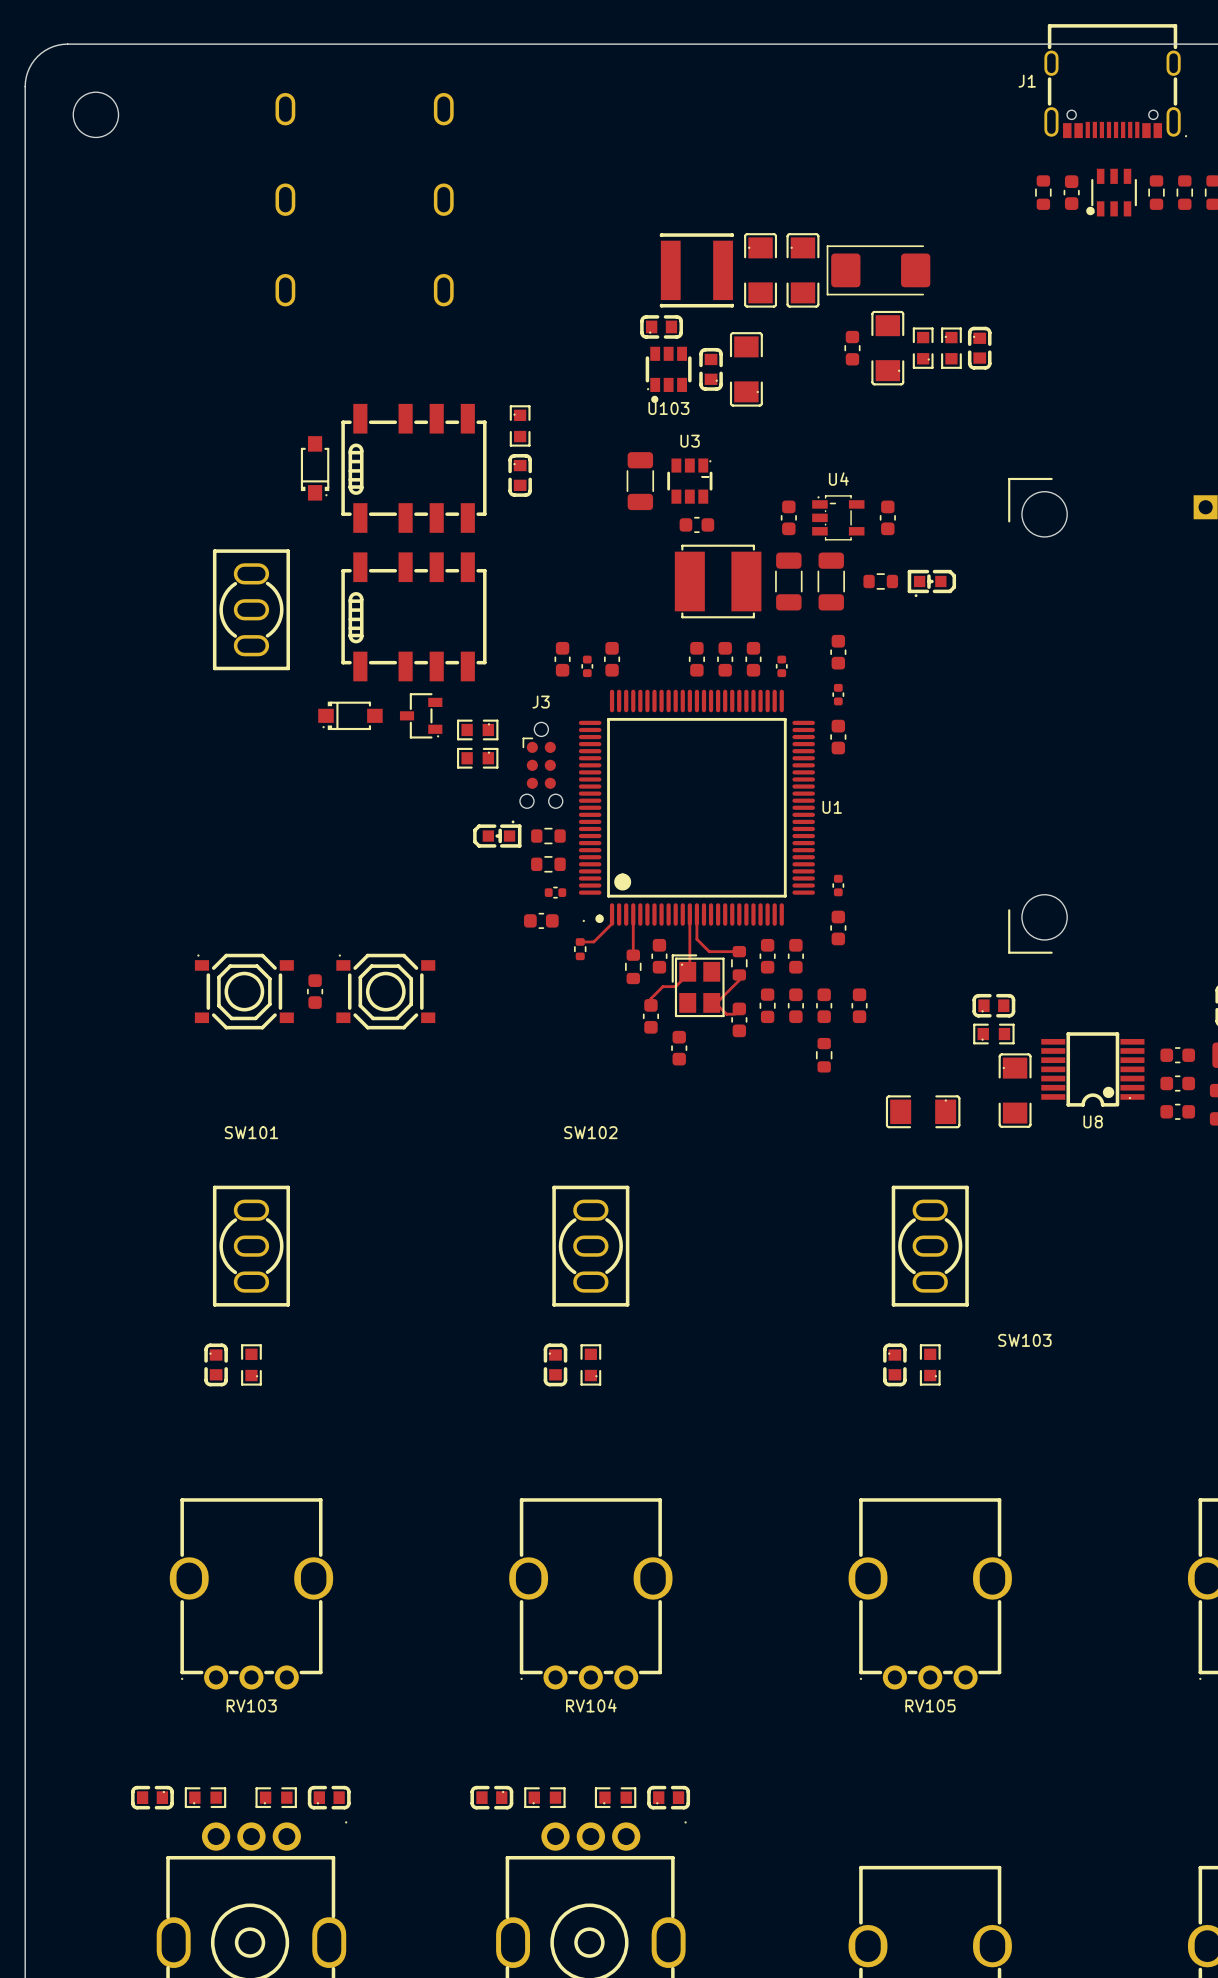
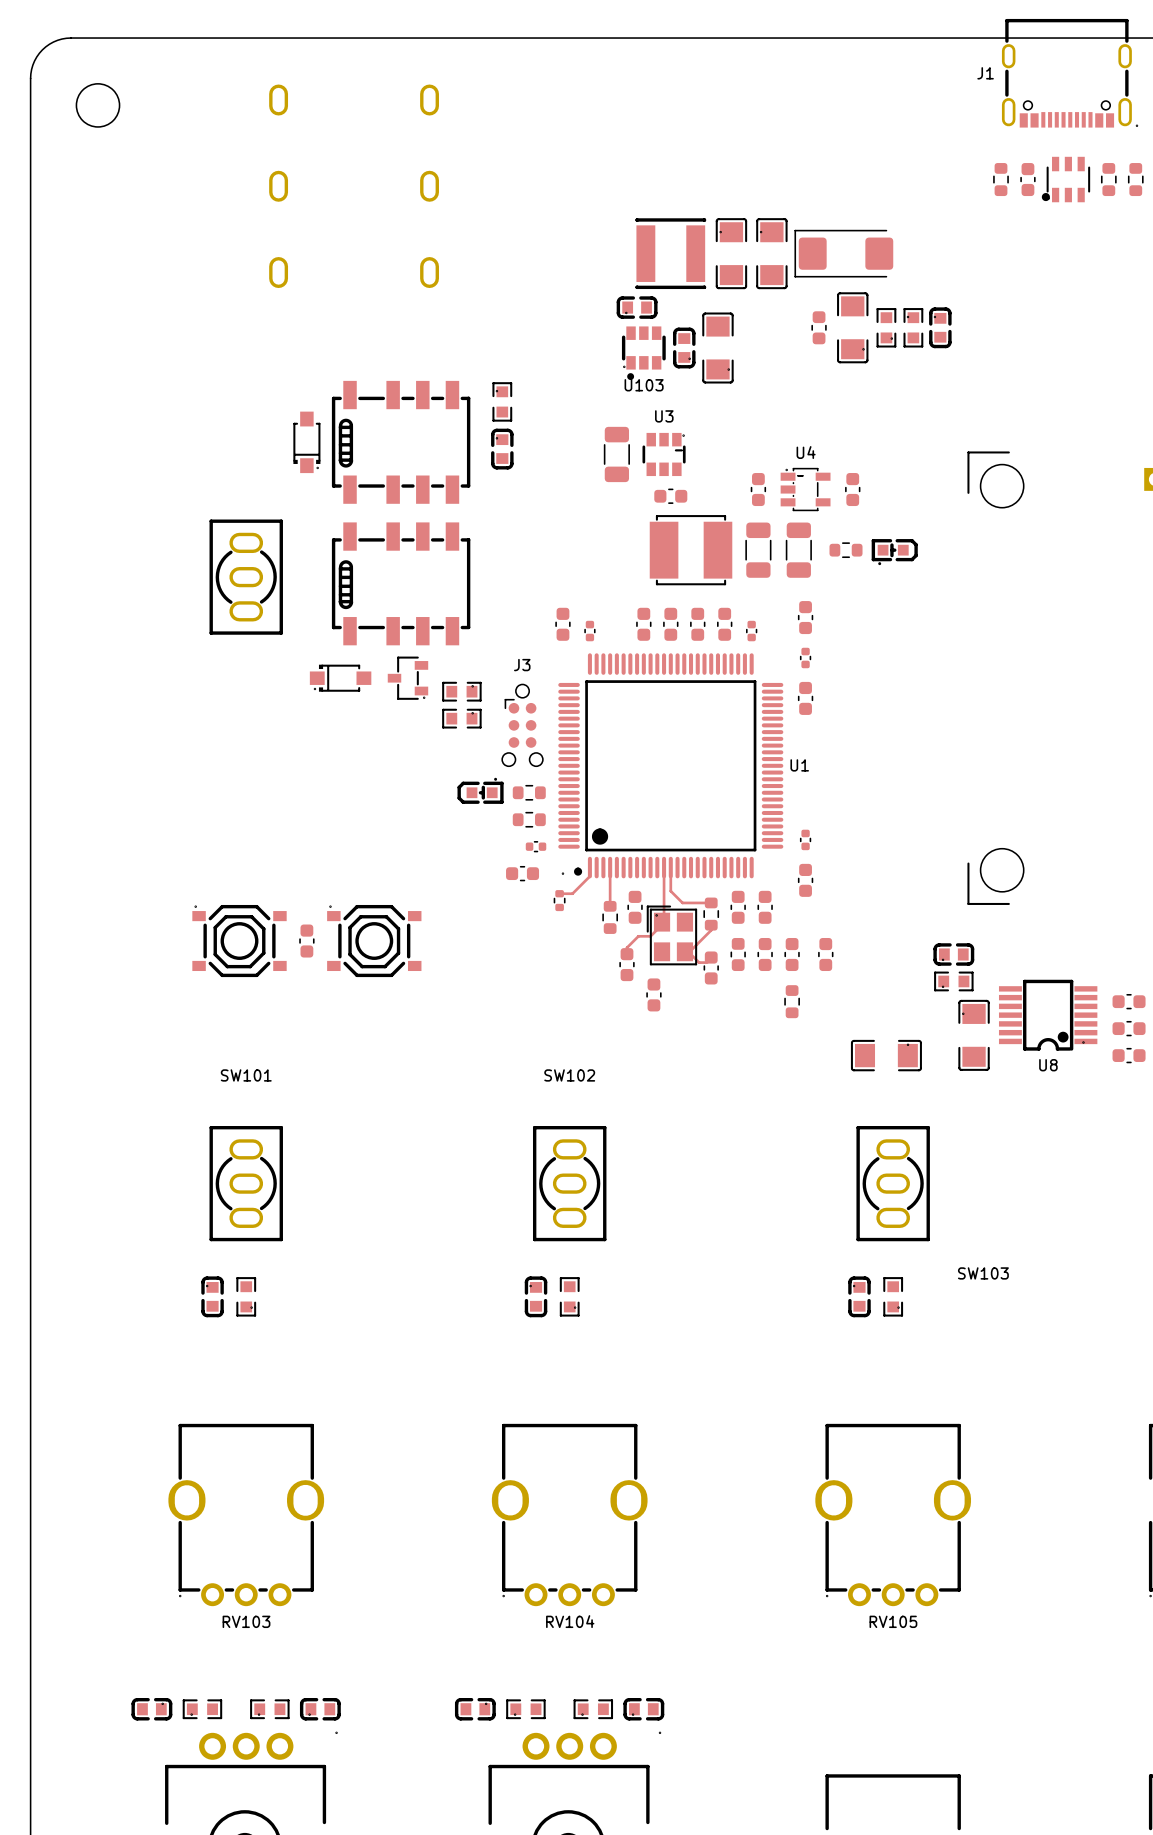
part footprint: [604, 641, 621, 677] -> [584, 620, 596, 642]
part footprint: [581, 655, 594, 678] -> [555, 607, 571, 641]
part position: (562, 659) -> (643, 624)

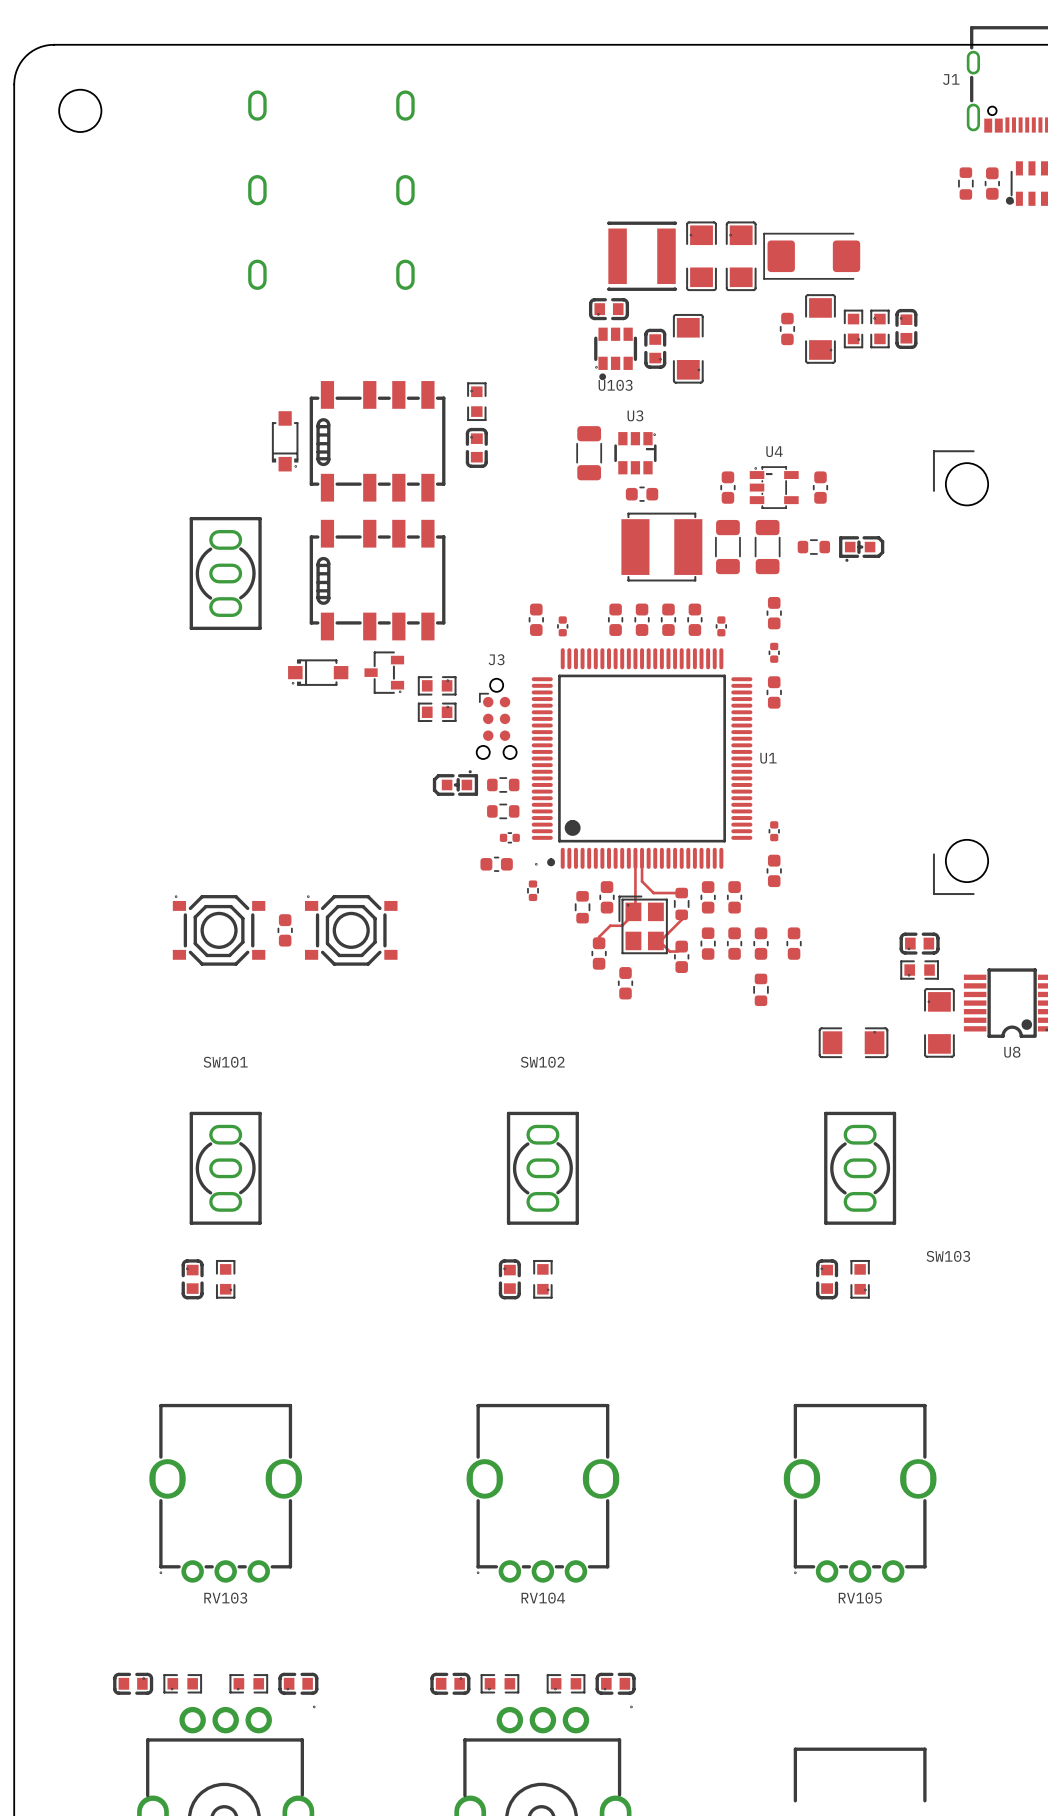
track: (589, 876) (572, 893) (559, 893) -> none
track: (610, 876) (610, 904) -> none

